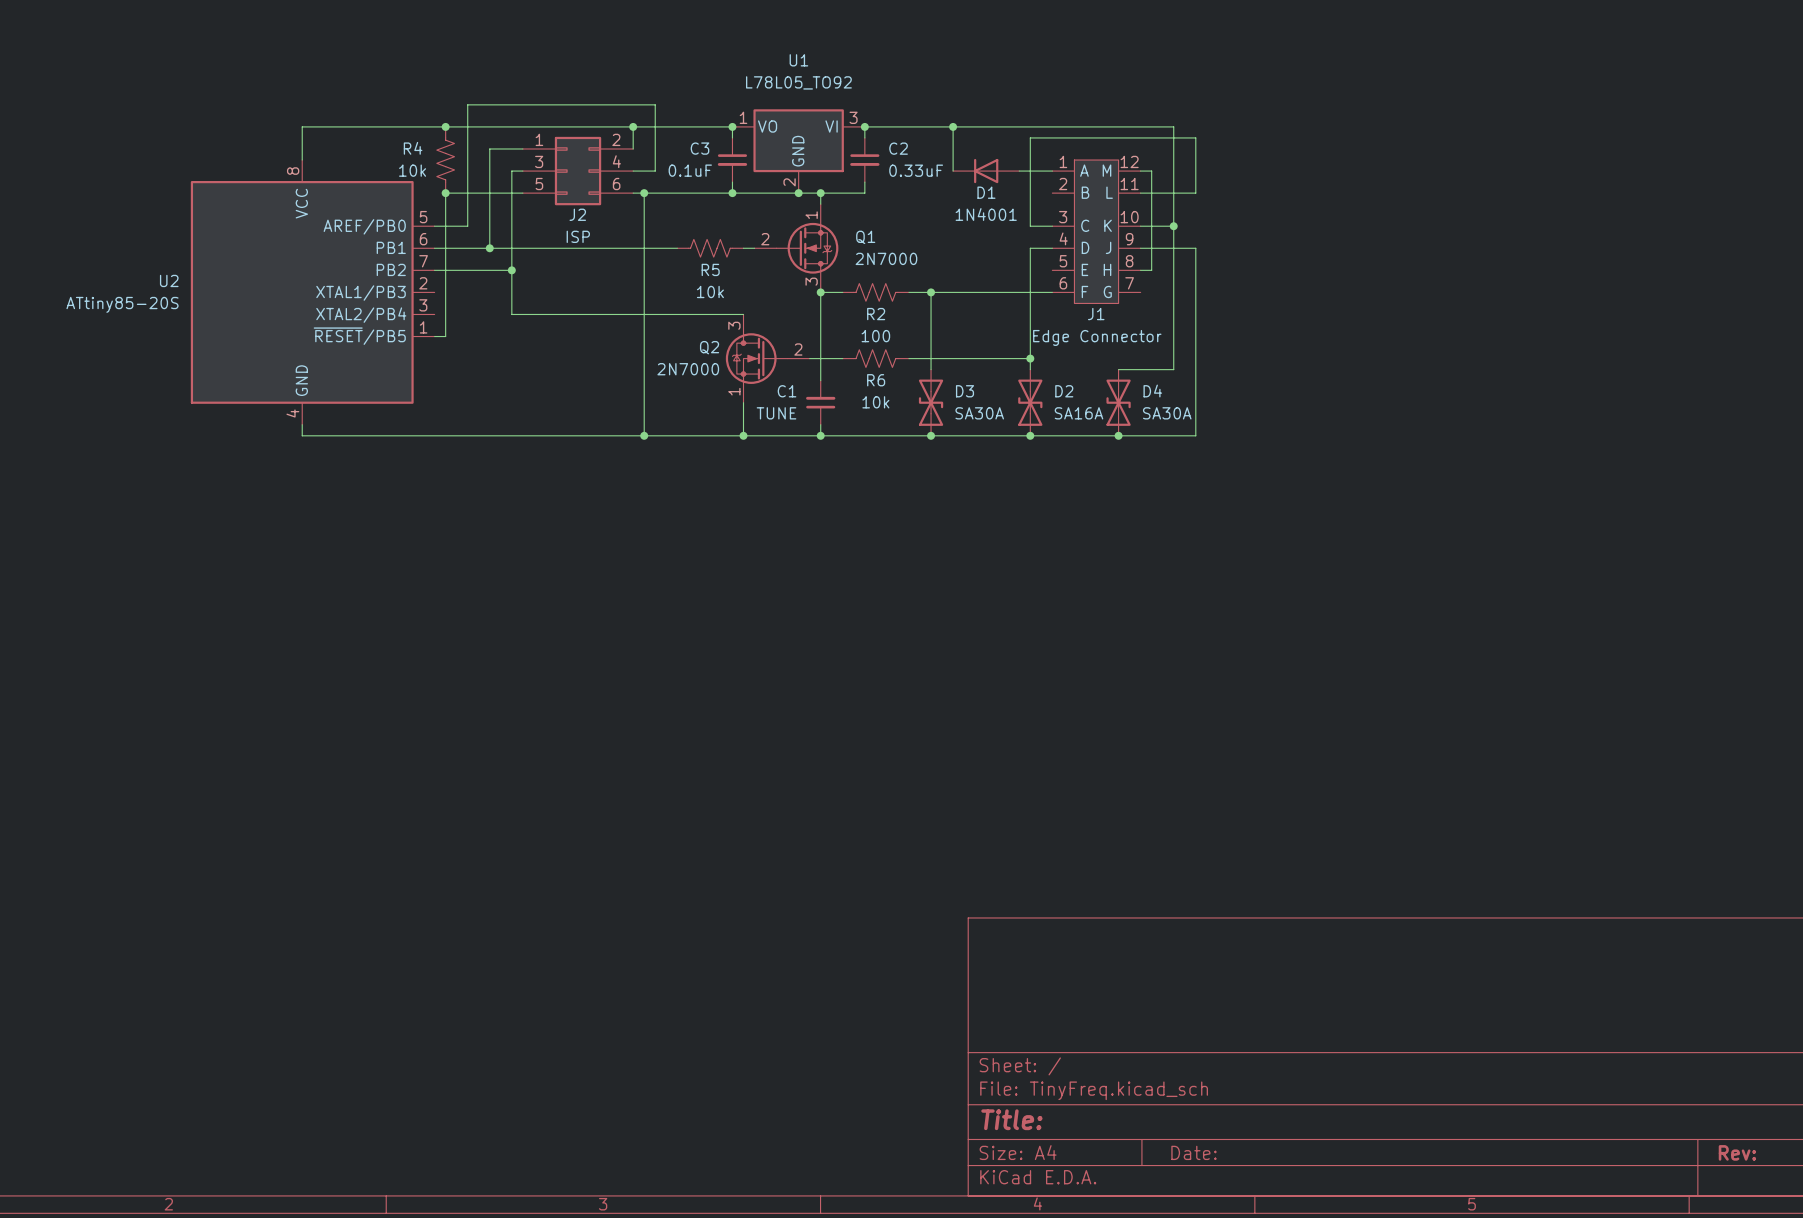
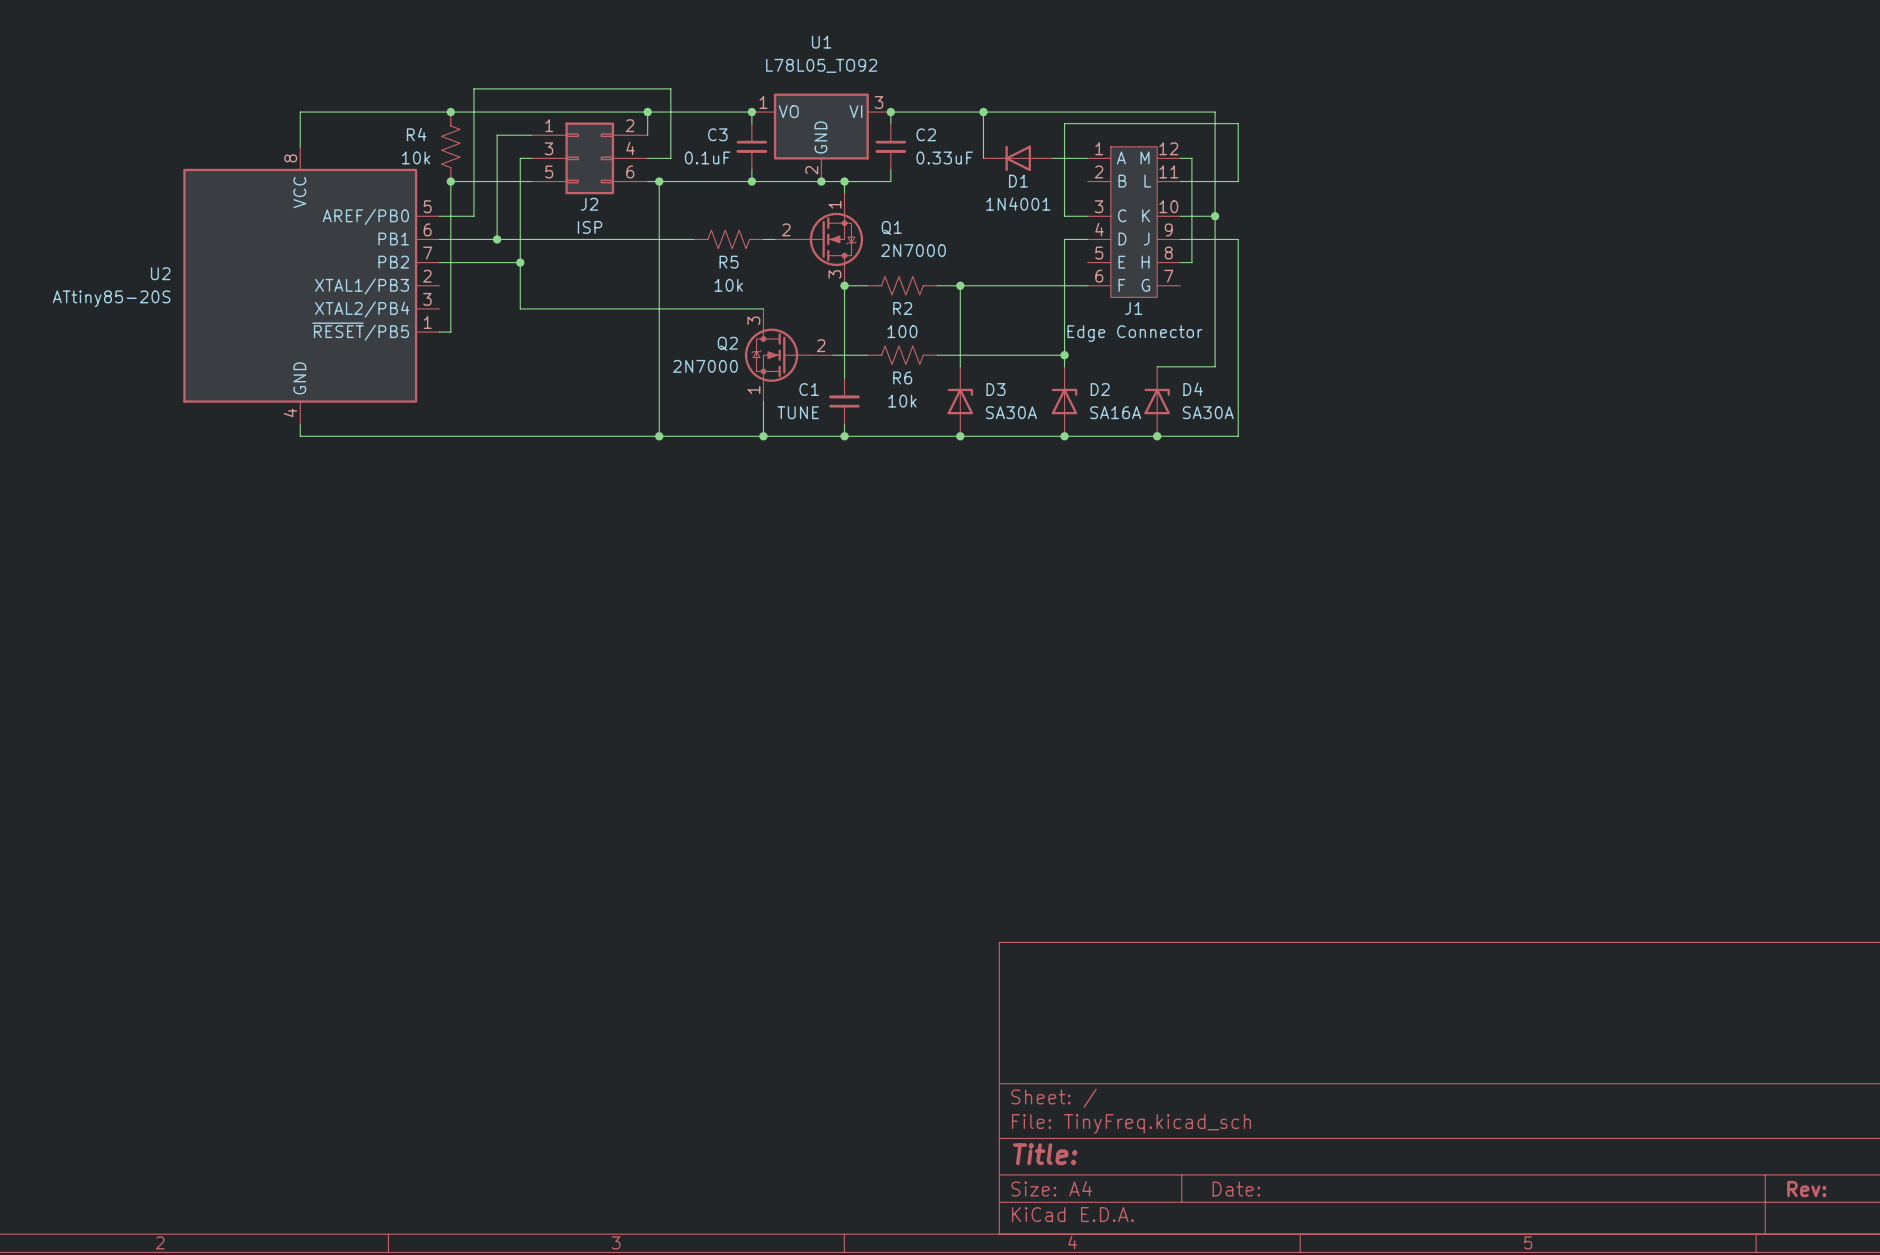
D3 symbol: [918, 369, 944, 436] -> [947, 366, 974, 437]
D2 symbol: [1018, 369, 1043, 436] -> [1051, 366, 1078, 437]
D4 symbol: [1106, 369, 1131, 436] -> [1144, 366, 1170, 437]

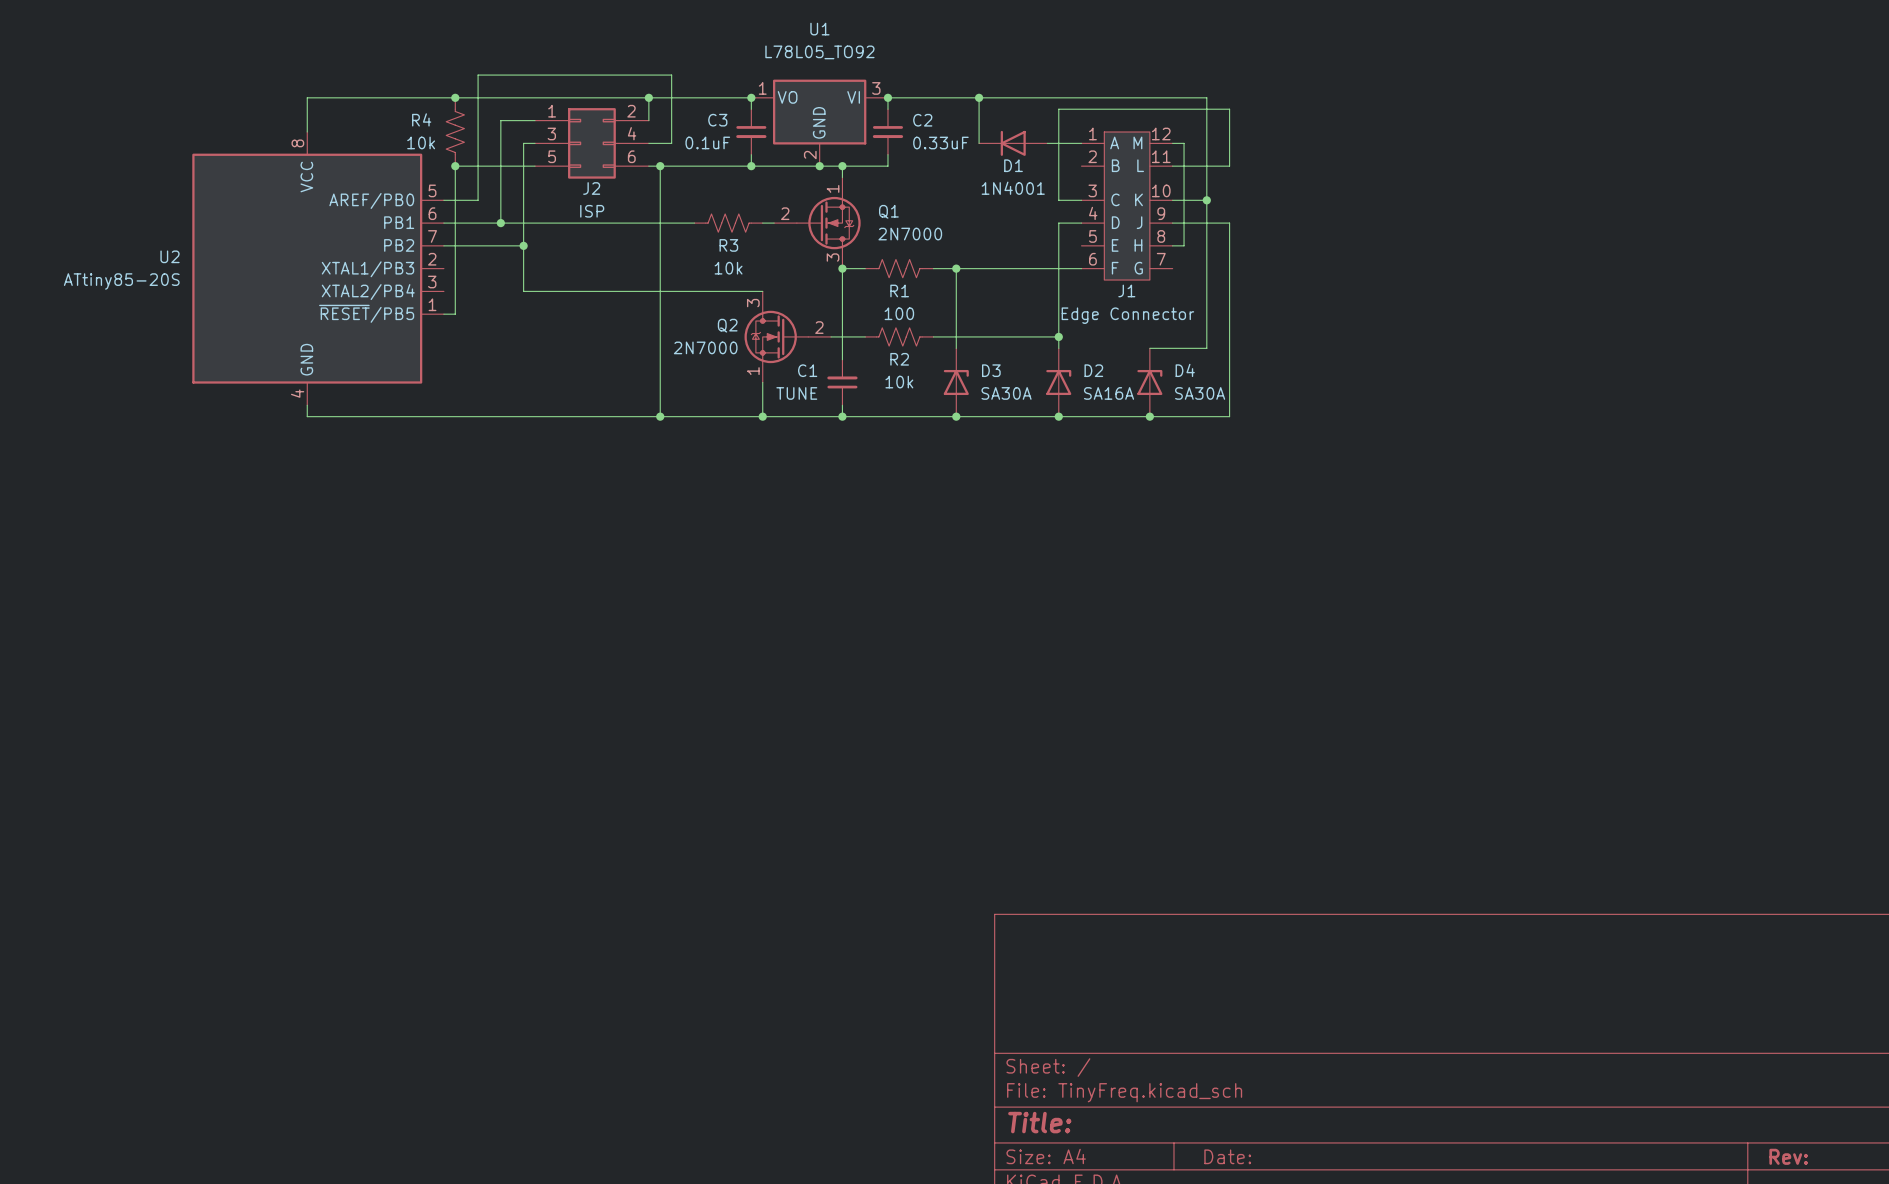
R5 name: R5 (729, 262) -> R3 (728, 245)
R2 name: R2 (902, 308) -> R1 (899, 290)
R6 name: R6 (902, 377) -> R2 (899, 359)

